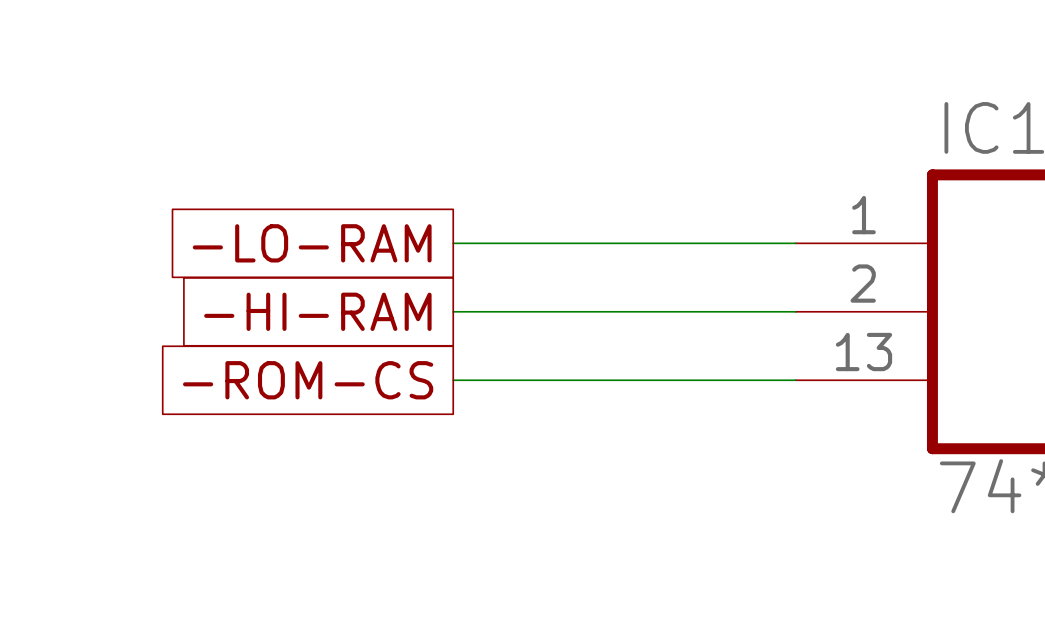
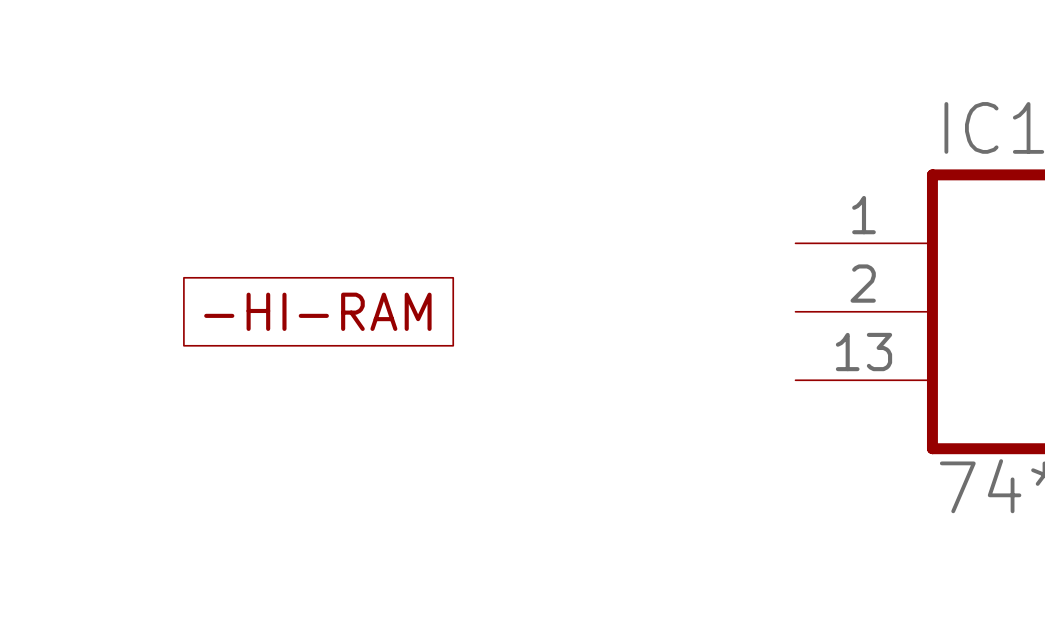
global label: -LO-RAM (312, 243) -> none
wire: (453, 243) (795, 243) -> none
wire: (453, 311) (795, 311) -> none
global label: -ROM-CS (308, 380) -> none
wire: (453, 380) (795, 380) -> none

